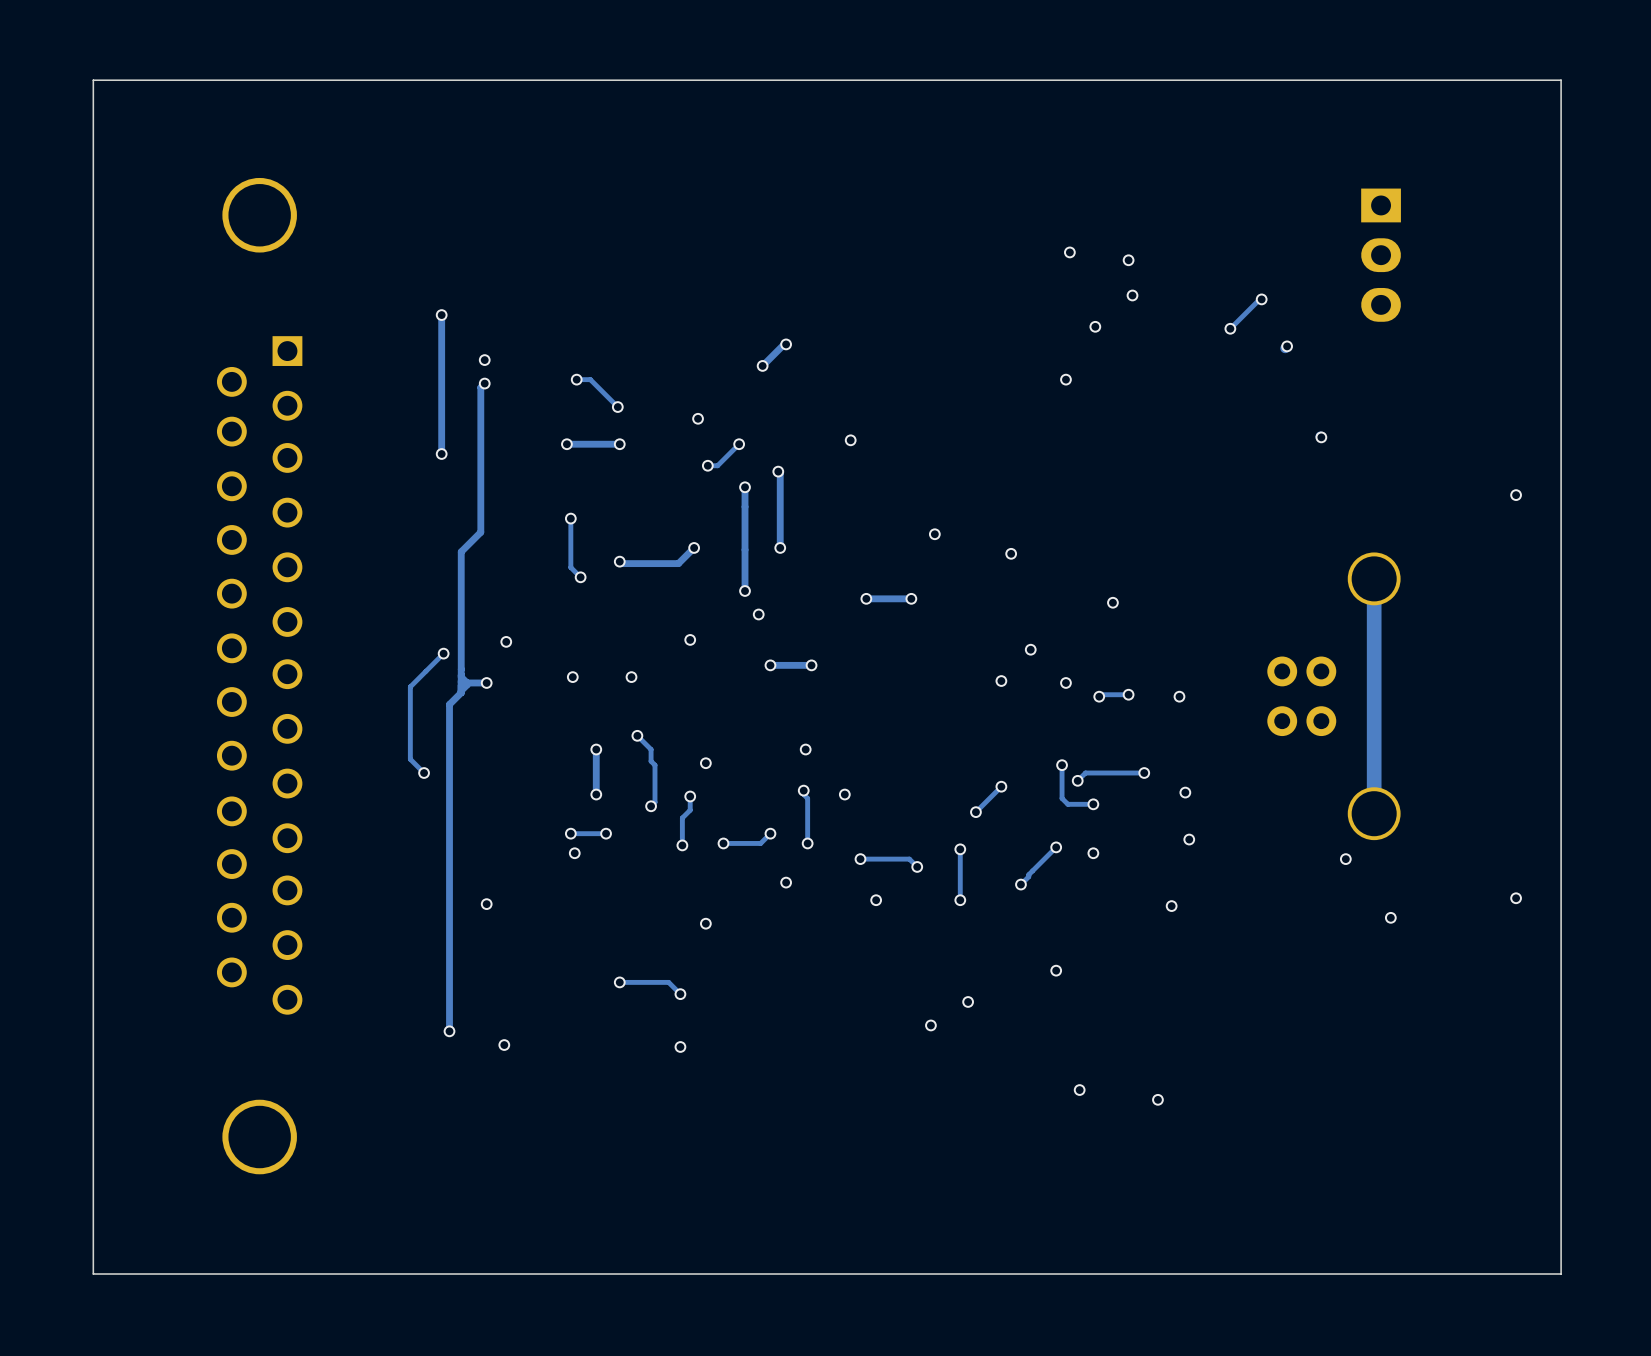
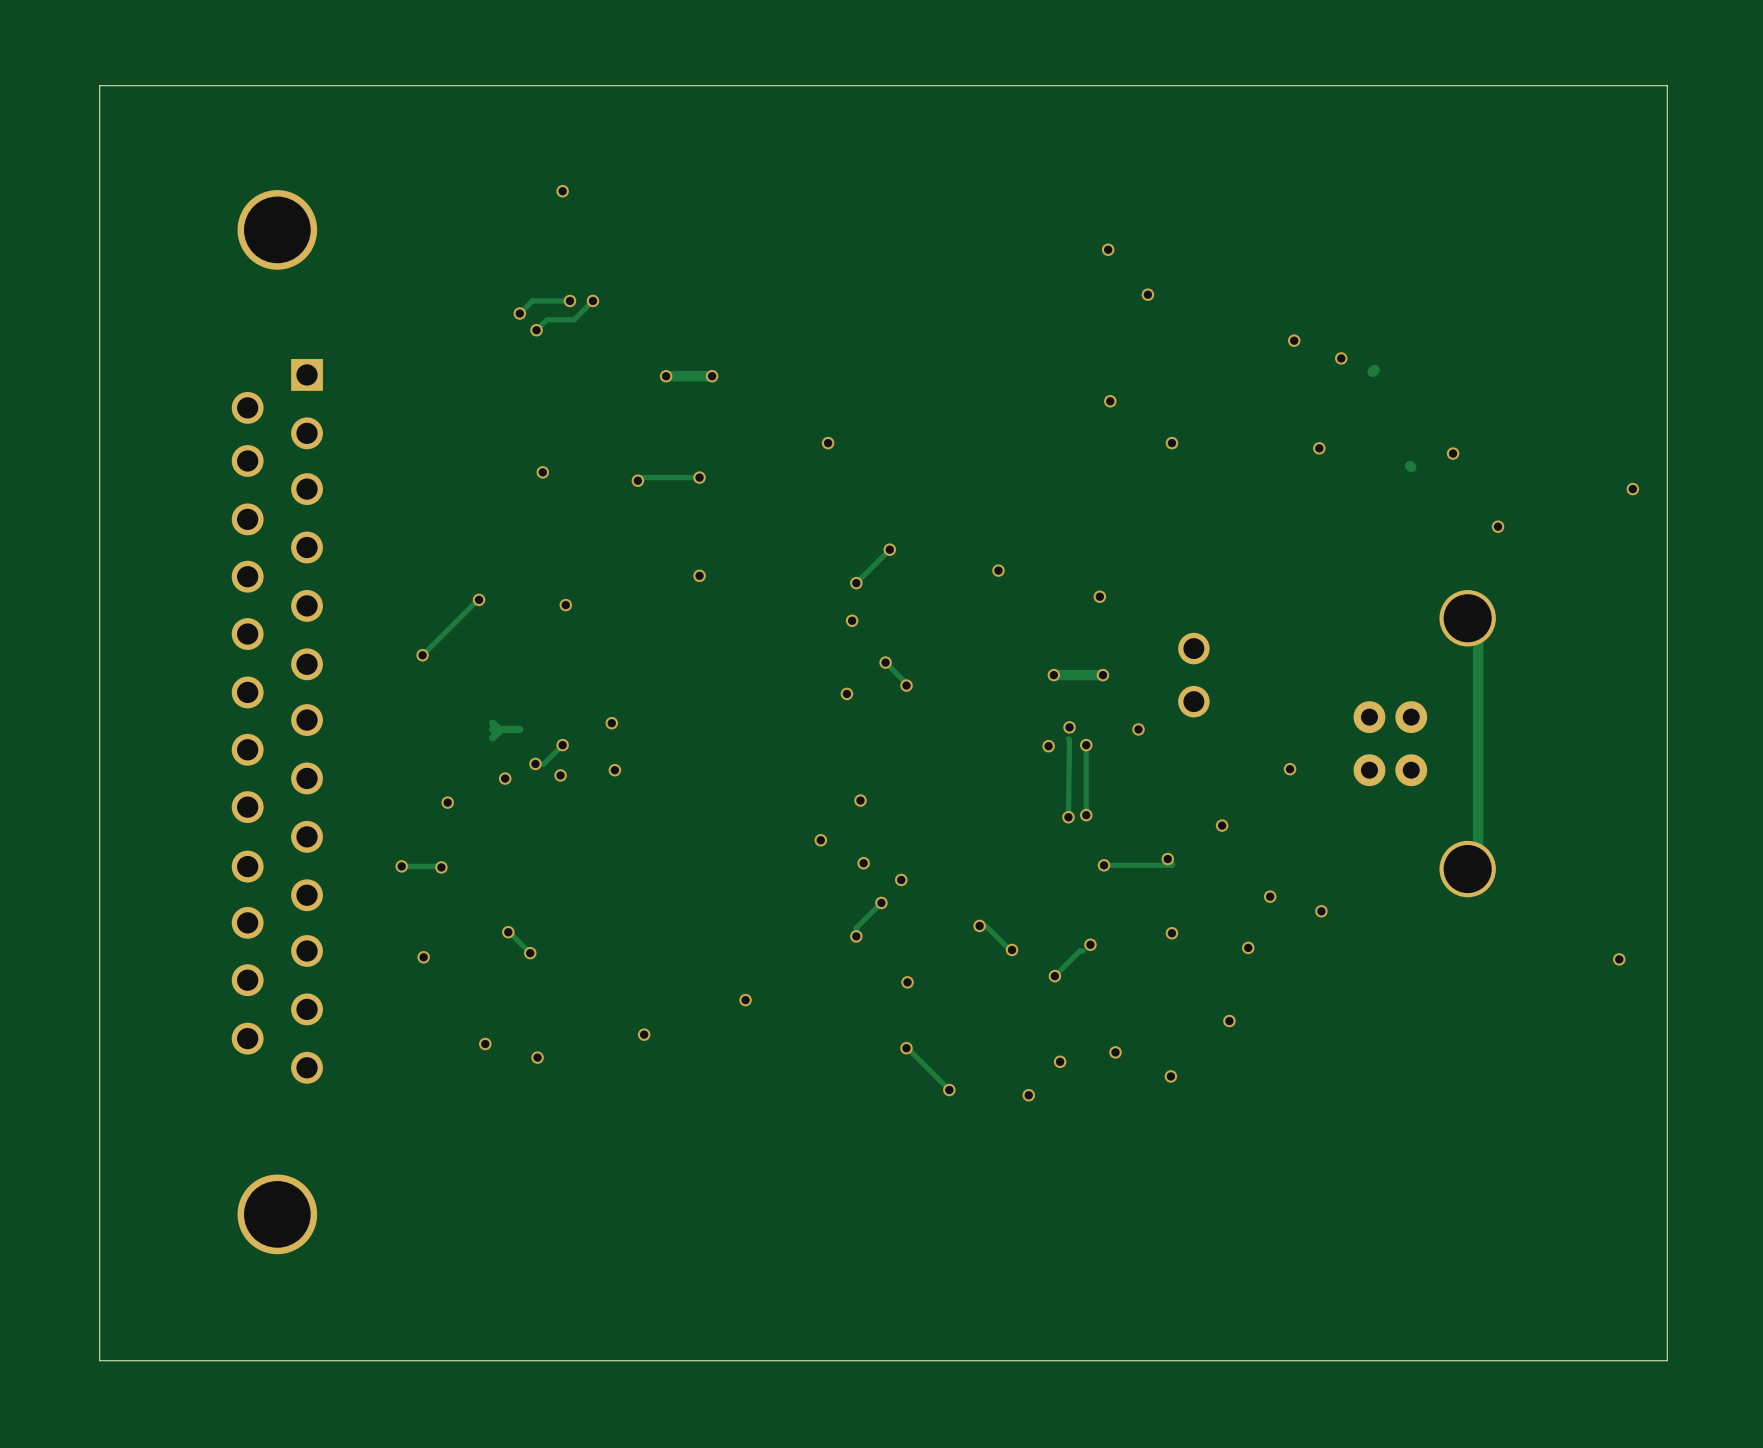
via: none -> (562, 191)
via: none -> (1108, 249)
via: (1069, 252) -> none
part: (1381, 255) -> none
via: (1128, 260) -> none
via: none -> (1147, 294)
track: none -> (569, 300) (532, 300) (519, 313)
via: none -> (569, 300)
track: none -> (592, 300) (574, 319) (546, 319) (536, 330)
via: none -> (592, 300)
via: none -> (519, 313)
via: (1132, 295) -> none
track: (1261, 299) (1230, 328) -> none
via: (1261, 299) -> none
via: none -> (536, 330)
track: (441, 315) (441, 454) -> none
via: (441, 315) -> none
via: none -> (1294, 340)
via: (1095, 326) -> none
via: (1230, 328) -> none
via: none -> (1341, 358)
track: (786, 344) (762, 365) -> none
via: (786, 344) -> none
via: (1287, 346) -> none
via: none -> (666, 376)
track: none -> (712, 376) (666, 376)
via: none -> (712, 376)
via: (484, 360) -> none
via: (762, 365) -> none
via: none -> (1110, 401)
track: (576, 379) (590, 379) (617, 407) -> none
via: (576, 379) -> none
via: (1065, 379) -> none
track: (484, 383) (480, 387) (480, 532) (461, 551) (461, 692) (449, 704) (449, 1031) -> none
via: (484, 383) -> none
via: (617, 407) -> none
via: none -> (828, 443)
via: none -> (1171, 443)
via: (698, 418) -> none
via: none -> (1319, 448)
via position: (1321, 437) -> (1453, 453)
via: (850, 440) -> none
via: none -> (542, 472)
via: (566, 444) -> none
track: (619, 444) (566, 444) -> none
via: (619, 444) -> none
track: (739, 444) (717, 465) (707, 465) -> none
via: (739, 444) -> none
track: none -> (699, 477) (641, 477) (637, 480)
via: none -> (699, 477)
via: none -> (637, 480)
via: (441, 454) -> none
via: (707, 465) -> none
track: (778, 471) (780, 473) (780, 547) -> none
via: (778, 471) -> none
track: (745, 487) (745, 591) -> none
via: (745, 487) -> none
via: none -> (1498, 526)
via position: (1516, 495) -> (1632, 489)
track: none -> (889, 549) (856, 583)
via: none -> (889, 549)
track: (570, 518) (570, 567) (580, 577) -> none
via: (570, 518) -> none
via: none -> (699, 575)
via: none -> (856, 583)
track: (694, 547) (678, 563) (621, 563) (619, 561) -> none
via: (694, 547) -> none
via: (780, 547) -> none
via position: (1011, 553) -> (1099, 596)
track: none -> (479, 599) (422, 655)
via: none -> (479, 599)
via: (619, 561) -> none
via: none -> (565, 605)
via: (580, 577) -> none
track: (1374, 578) (1374, 813) -> (1478, 607) (1478, 858)
via: none -> (852, 620)
via: (745, 591) -> none
via: (866, 598) -> none
track: (911, 598) (866, 598) -> none
via: (911, 598) -> none
via: (1112, 602) -> none
via: none -> (422, 655)
via: (758, 614) -> none
track: none -> (885, 662) (906, 685)
via: none -> (885, 662)
via: none -> (1053, 675)
track: none -> (1102, 675) (1053, 675)
part: none -> (1193, 675)
via: (690, 639) -> none
via: (506, 641) -> none
via: none -> (906, 685)
via: none -> (846, 693)
via position: (1030, 649) -> (1102, 675)
track: (443, 653) (410, 686) (410, 759) (424, 773) (426, 771) -> none
via: (443, 653) -> none
via: (770, 665) -> none
track: (811, 665) (770, 665) -> none
via: (811, 665) -> none
via: (631, 677) -> none
via: (486, 682) -> none
track: none -> (1068, 738) (1068, 817)
track: (1128, 694) (1101, 694) (1099, 696) -> none
via: (1128, 694) -> none
via: (1099, 696) -> none
via position: (1179, 696) -> (1290, 769)
track: none -> (562, 745) (543, 763) (535, 763)
via: none -> (562, 745)
track: none -> (1086, 745) (1086, 815)
via: none -> (1086, 745)
via: none -> (1048, 746)
via: none -> (535, 763)
via: none -> (614, 770)
via: none -> (560, 775)
via: none -> (505, 778)
track: (637, 735) (651, 749) (651, 761) (654, 765) (654, 802) (651, 806) -> none
via: (637, 735) -> none
track: (596, 749) (596, 794) -> none
via: (596, 749) -> none
via: none -> (447, 802)
via: (705, 763) -> none
via: none -> (1086, 815)
via: none -> (1068, 817)
track: (1062, 765) (1062, 798) (1067, 804) (1093, 804) -> none
via: (1062, 765) -> none
via: (424, 773) -> none
track: (1144, 773) (1085, 773) (1077, 780) -> none
via: (1077, 780) -> none
via: none -> (820, 840)
track: (1001, 786) (975, 812) -> none
via: (1001, 786) -> none
track: (803, 790) (803, 794) (807, 798) (807, 843) -> none
via: (803, 790) -> none
via: (1185, 792) -> none
via: (596, 794) -> none
via: (844, 794) -> none
track: (690, 796) (690, 810) (682, 818) (682, 845) -> none
via: (690, 796) -> none
via: (651, 806) -> none
via: none -> (863, 863)
track: none -> (1172, 864) (1104, 865)
via: none -> (1104, 865)
track: none -> (401, 866) (441, 867)
via: none -> (401, 866)
via: none -> (441, 867)
via: (975, 812) -> none
via: none -> (901, 879)
via: (570, 833) -> none
track: (606, 833) (570, 833) -> none
via: (606, 833) -> none
track: (770, 833) (760, 843) (723, 843) -> none
via: (770, 833) -> none
via: (723, 843) -> none
via: (807, 843) -> none
via: (682, 845) -> none
track: none -> (881, 902) (856, 928) (856, 936)
via: none -> (881, 902)
track: (1056, 847) (1020, 884) -> none
via: (1056, 847) -> none
track: (960, 849) (960, 900) -> none
via: (960, 849) -> none
via: (574, 853) -> none
via position: (1093, 853) -> (1171, 933)
via: none -> (1321, 911)
track: (860, 859) (909, 859) (917, 866) -> none
via: (860, 859) -> none
via: (1345, 859) -> none
track: none -> (985, 925) (1012, 949)
track: none -> (508, 932) (530, 953)
via: none -> (508, 932)
via: none -> (856, 936)
via: (786, 882) -> none
via: none -> (1012, 949)
track: none -> (1083, 951) (1079, 951) (1054, 976)
via: none -> (423, 957)
via: (876, 900) -> none
via: (960, 900) -> none
via position: (486, 904) -> (530, 953)
via position: (1171, 906) -> (1248, 947)
via: none -> (1054, 976)
via: (1390, 917) -> none
via: none -> (907, 982)
via position: (705, 923) -> (745, 1000)
via: none -> (1229, 1021)
via position: (1056, 970) -> (1115, 1052)
via: none -> (485, 1044)
track: none -> (906, 1048) (949, 1090)
via: none -> (906, 1048)
via position: (619, 982) -> (644, 1034)
track: (620, 983) (668, 982) (680, 994) -> none
via: none -> (537, 1057)
via: (680, 994) -> none
via: none -> (1060, 1061)
via: (968, 1001) -> none
via: none -> (1170, 1076)
via: none -> (949, 1090)
via: (930, 1025) -> none
via: none -> (1028, 1095)
via: (449, 1031) -> none
via: (504, 1045) -> none
via: (680, 1046) -> none
via: (1079, 1090) -> none
via: (1157, 1099) -> none

